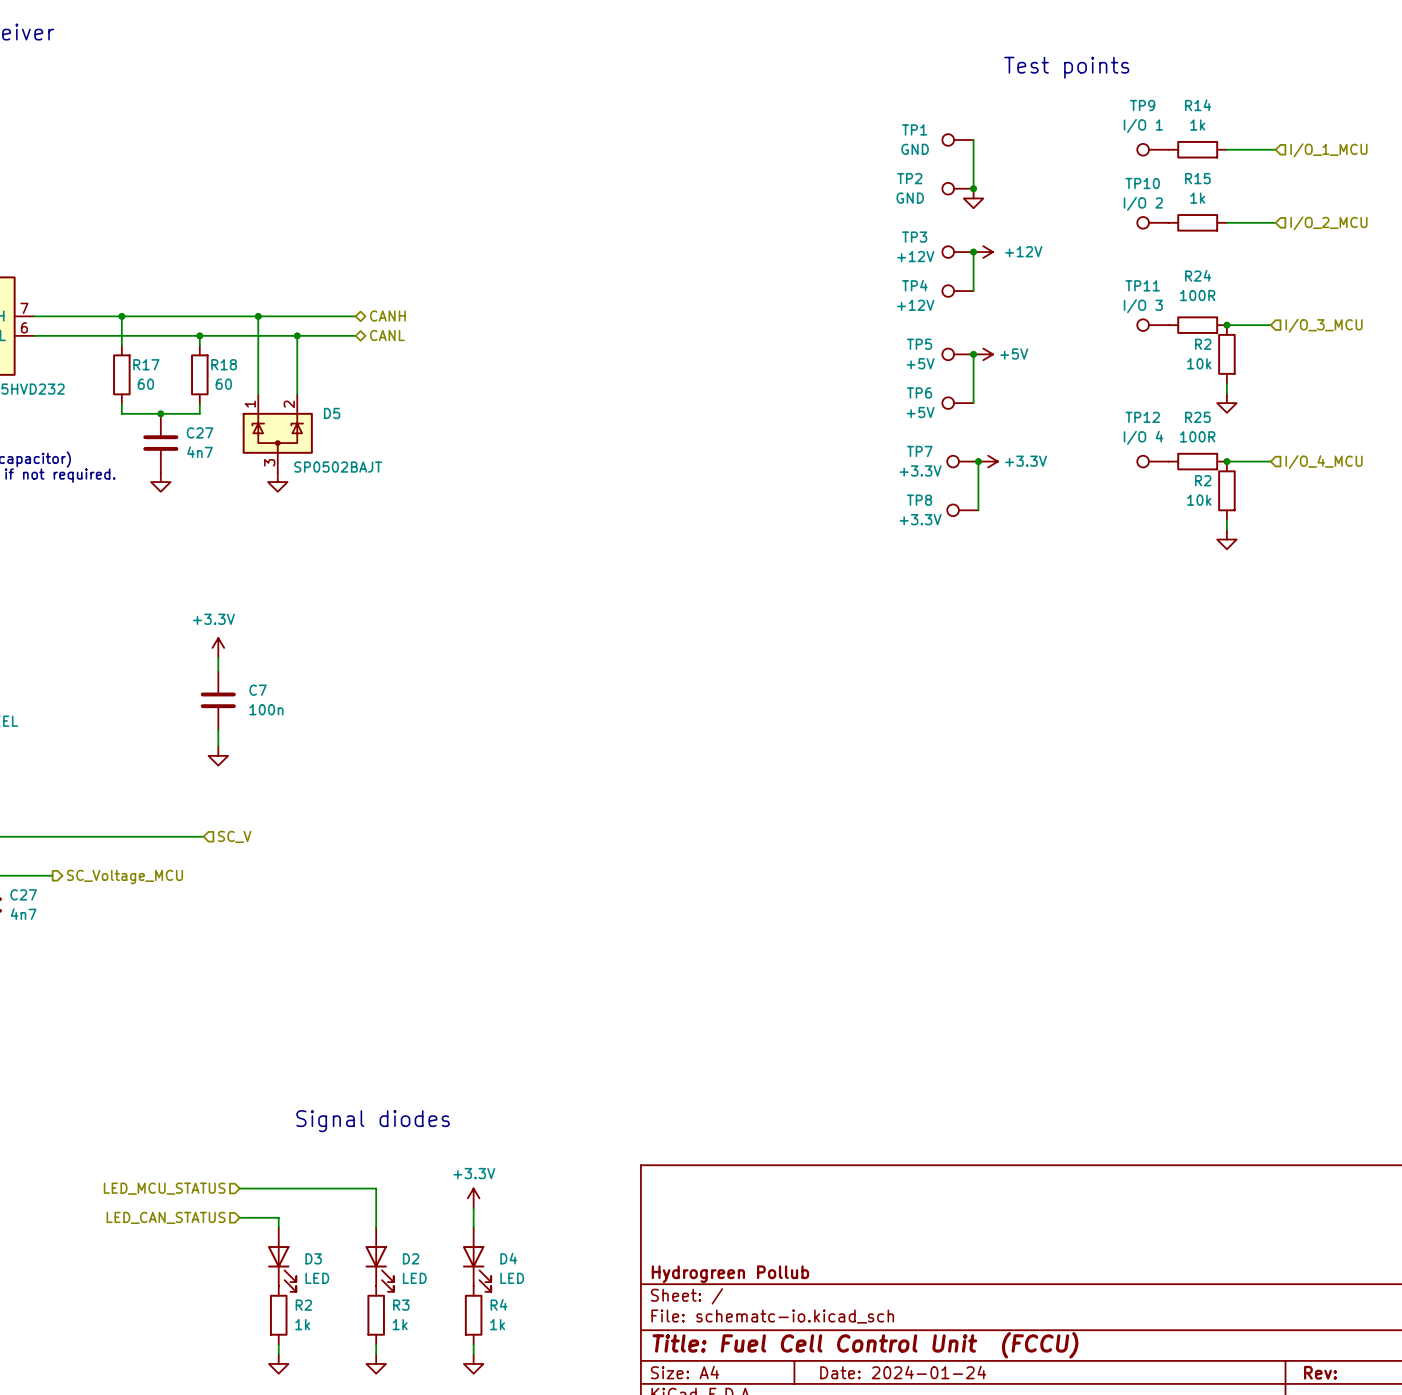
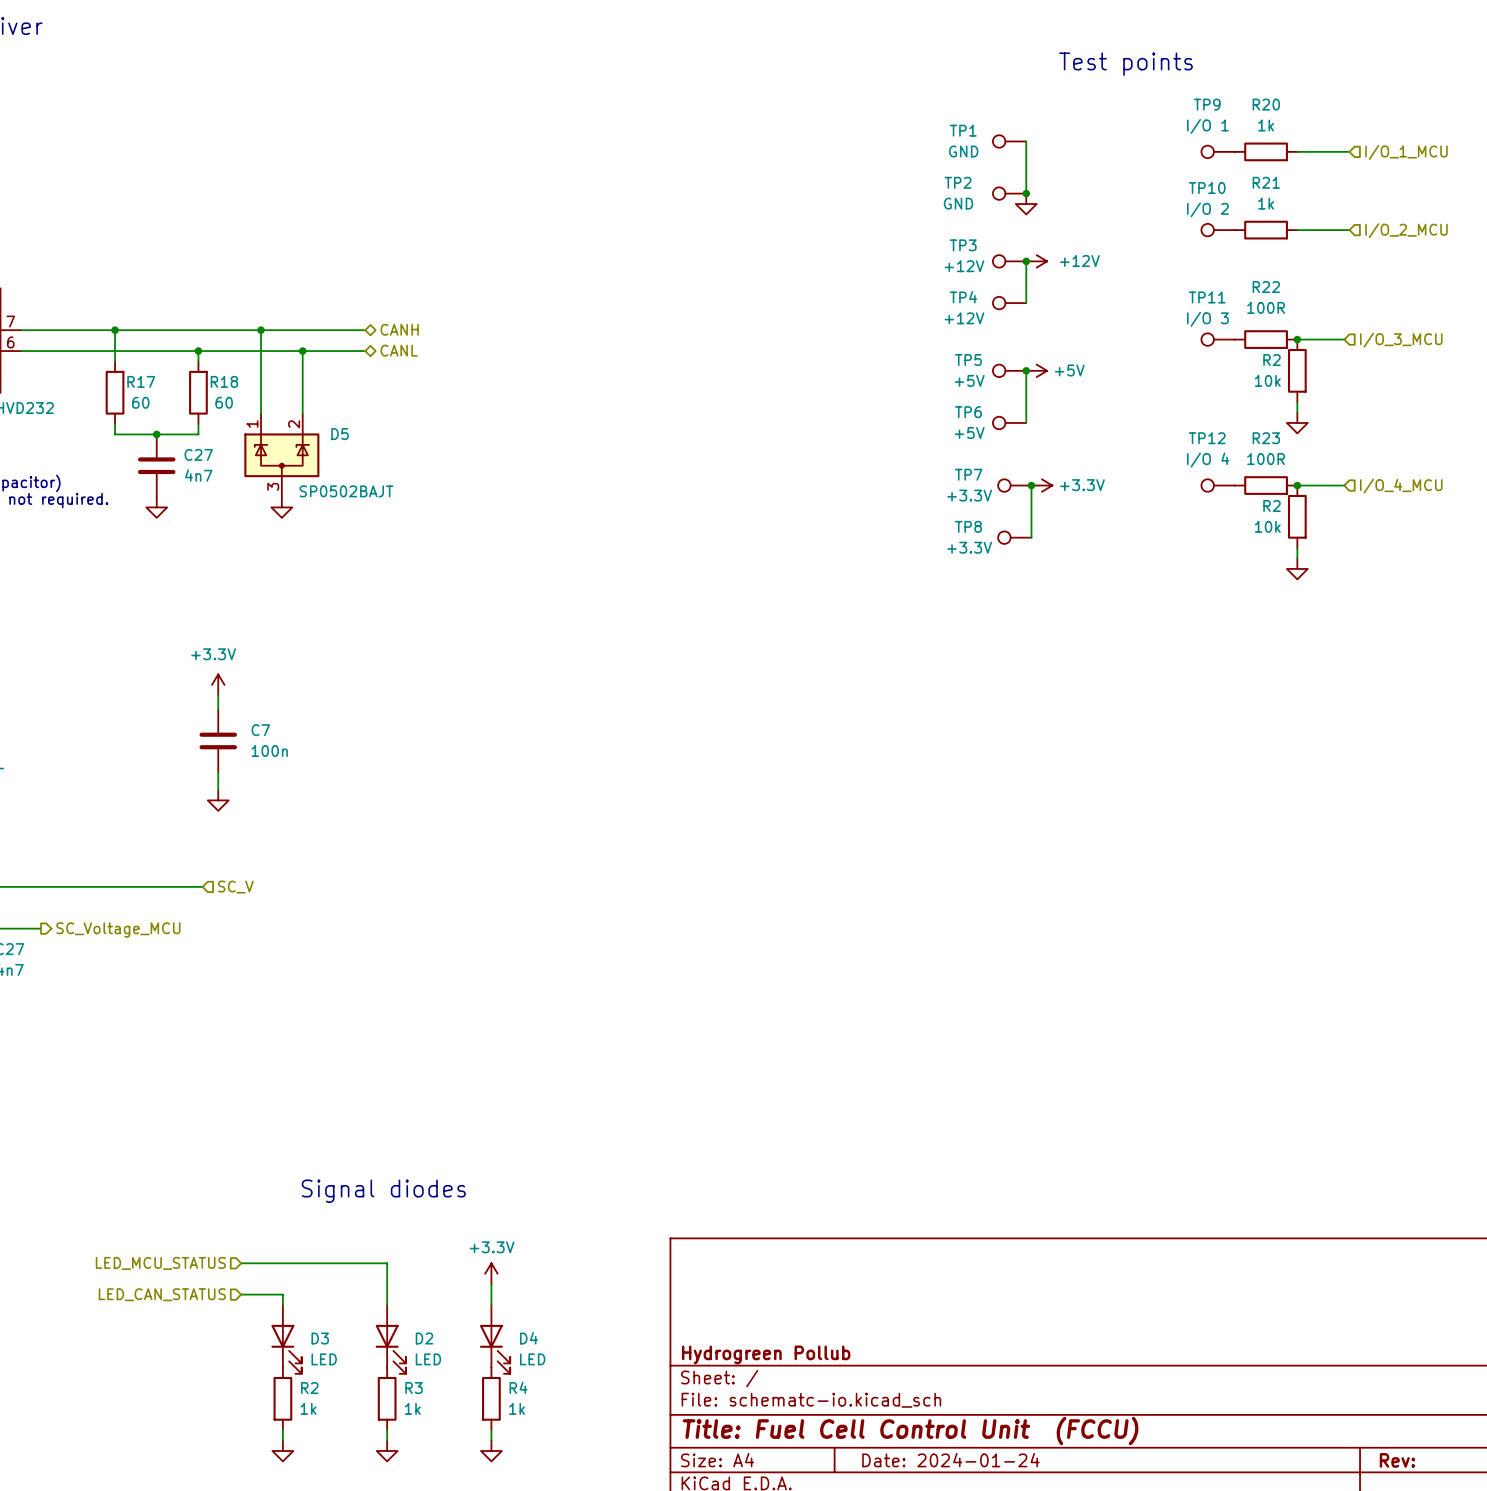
R14 name: R14 (1198, 105) -> R20 (1266, 104)
R15 name: R15 (1197, 178) -> R21 (1266, 182)
R24 name: R24 (1198, 275) -> R22 (1266, 287)
R25 name: R25 (1197, 417) -> R23 (1266, 438)

